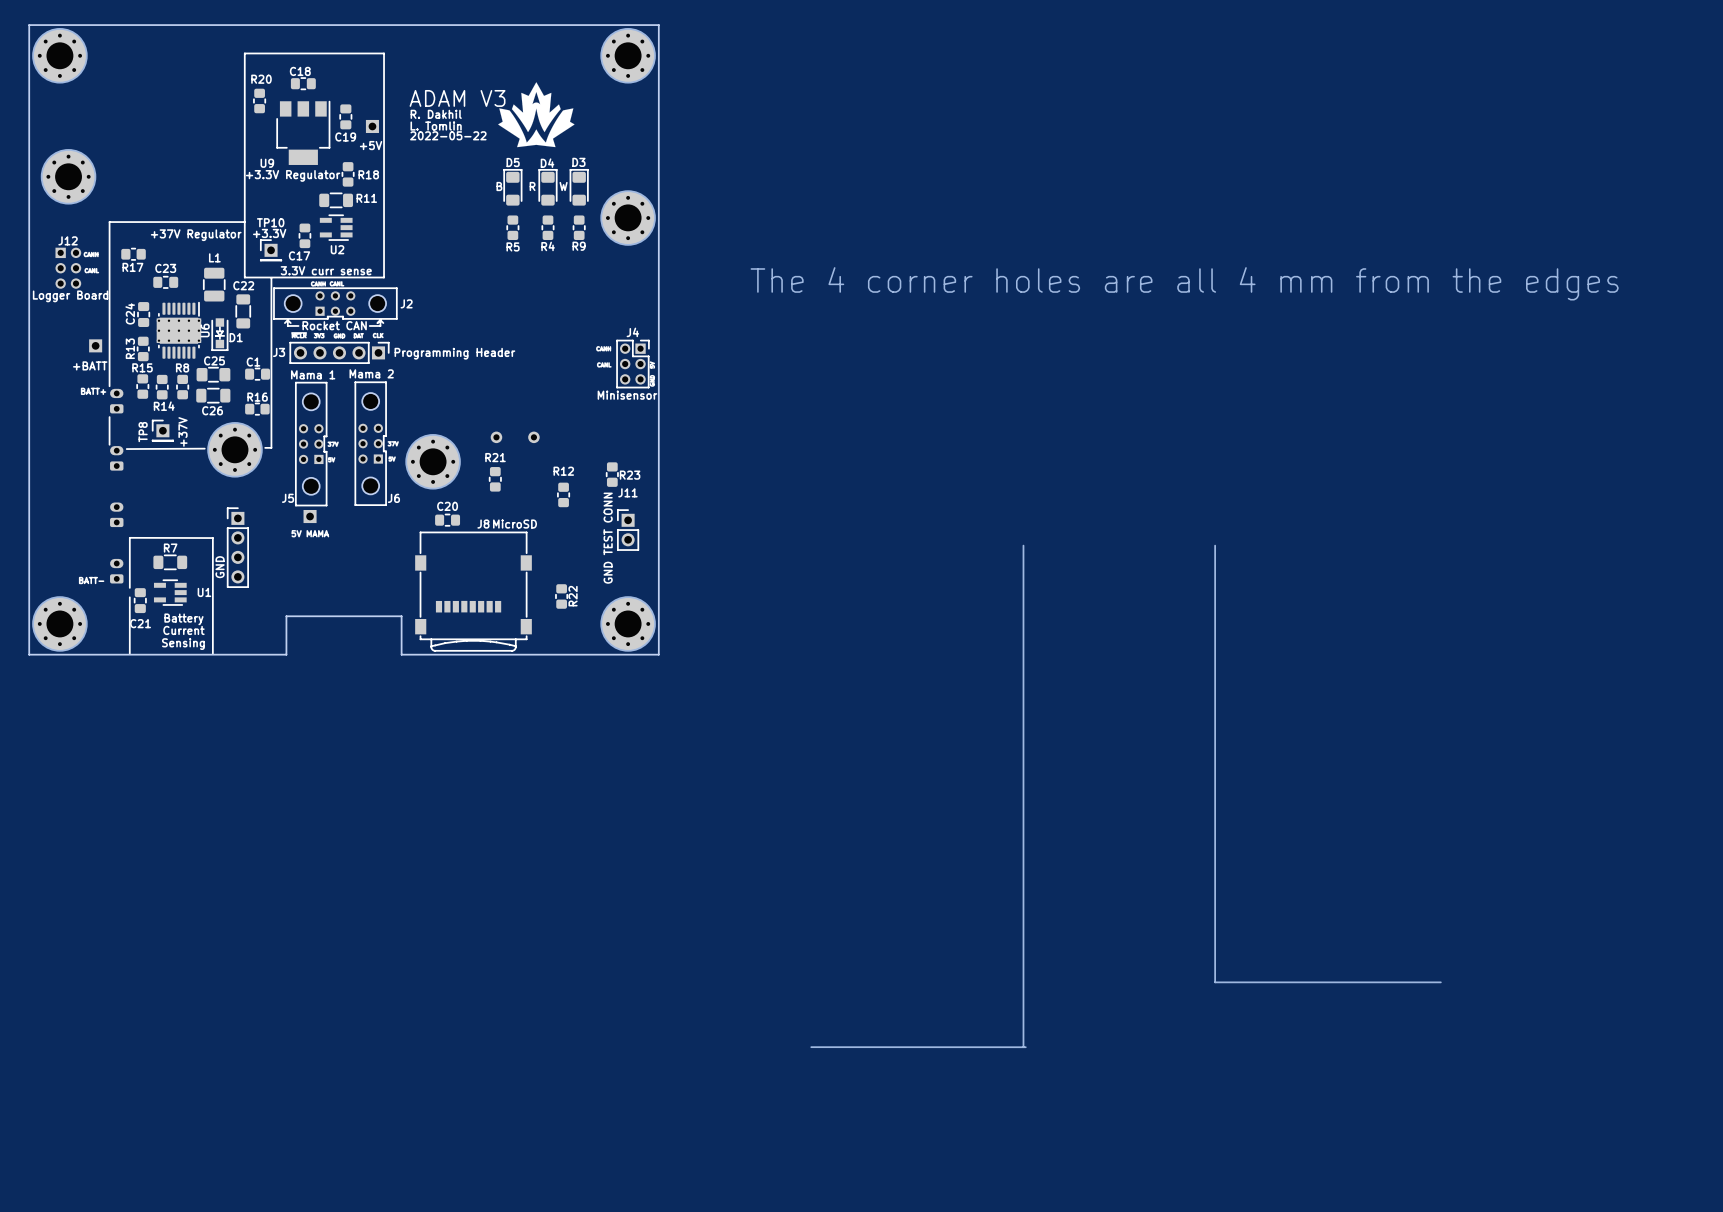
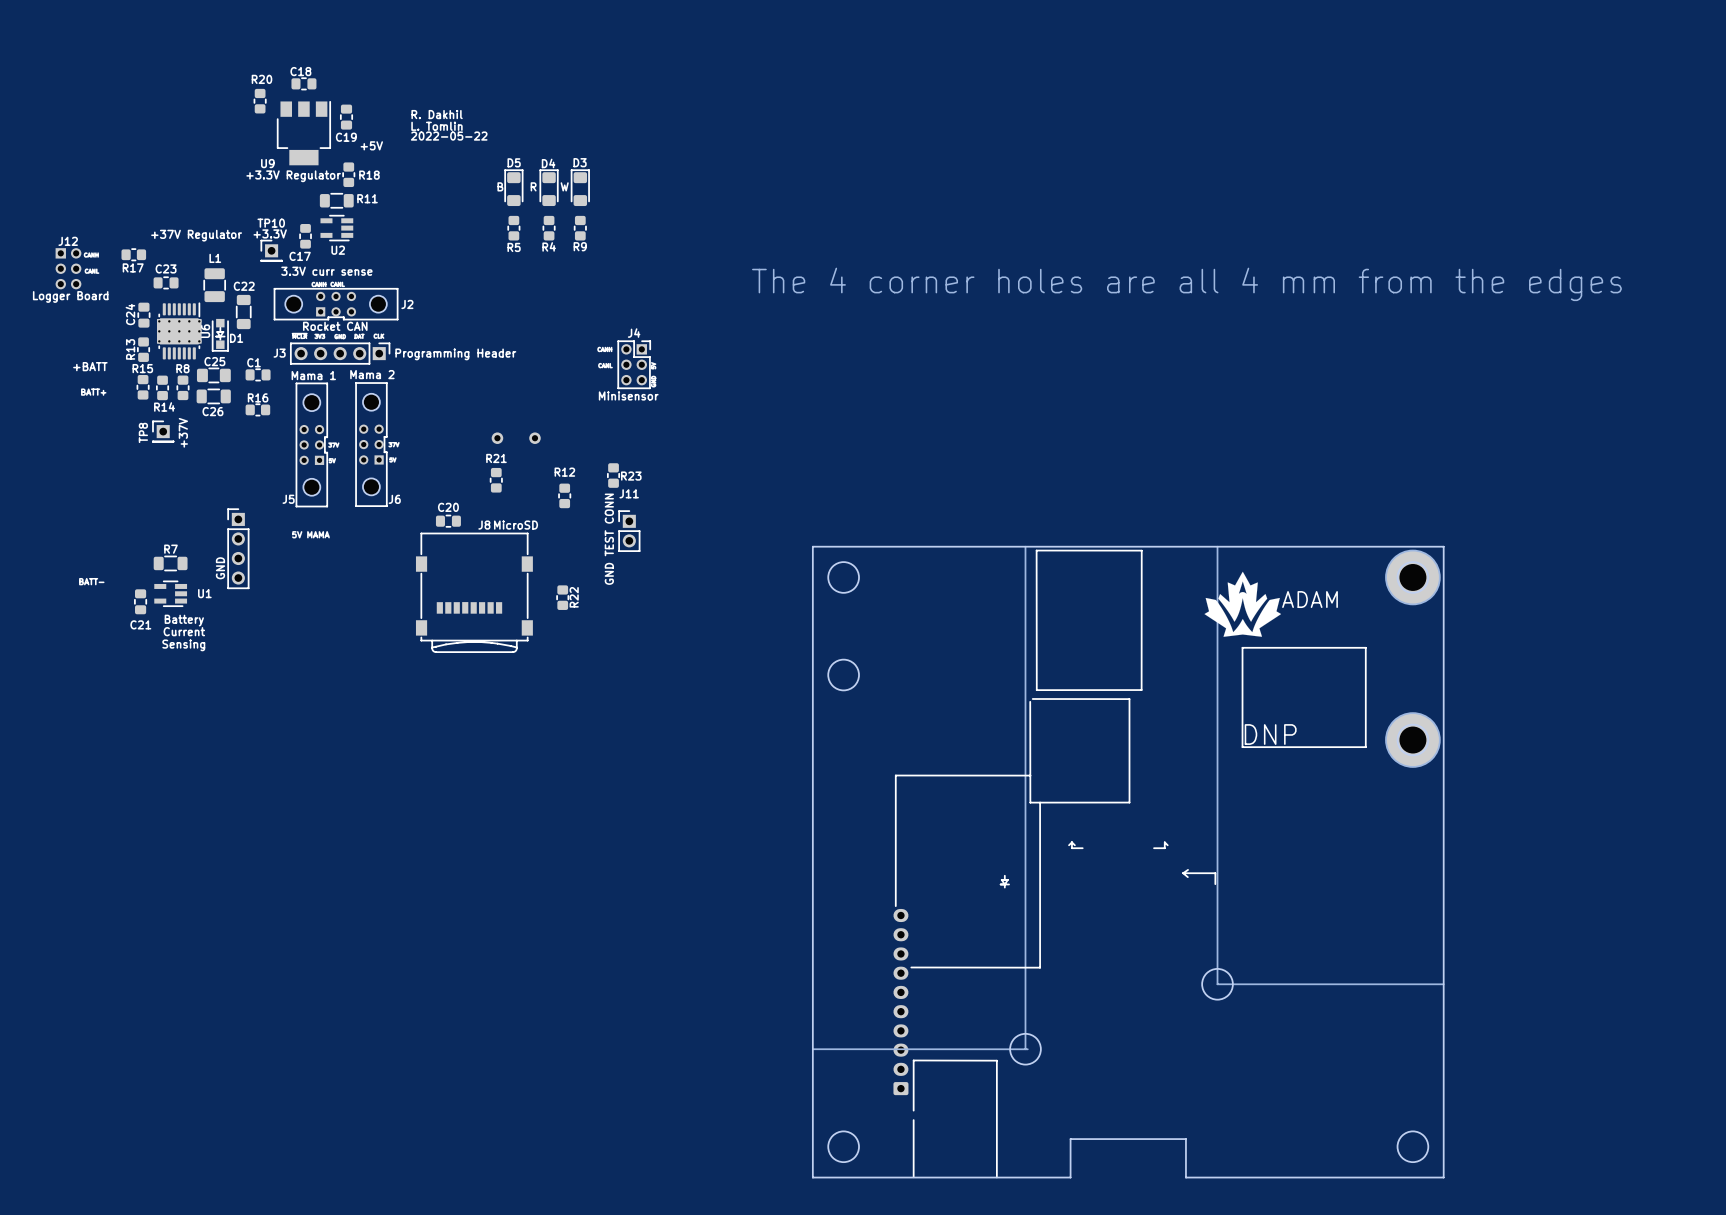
board edge: (29, 25) (658, 25) (658, 654) (401, 654) (401, 616) (286, 616) (286, 654) (29, 654) (29, 25) -> none
line: (244, 53) (384, 53) (384, 277) (244, 277) (244, 53) -> none
part: (59, 55) -> none
part: (628, 55) -> none
drawing: [498, 82, 575, 148] -> none
text: ADAM V3 (457, 98) -> none
part: (372, 126) -> none
part: (68, 176) -> none
part: (628, 218) -> none
line: (244, 222) (109, 222) (109, 386) -> none
line: (271, 277) (271, 447) (265, 447) -> none
line: (287, 320) (284, 323) -> none
line: (287, 320) (287, 325) (298, 325) -> none
line: (287, 320) (290, 323) -> none
line: (380, 320) (383, 323) -> none
line: (380, 320) (380, 325) (369, 325) -> none
part: (95, 345) -> none
part: (116, 401) -> none
line: (109, 417) (109, 444) -> none
line: (204, 448) (126, 449) -> none
part: (234, 449) -> none
part: (116, 458) -> none
part: (433, 461) -> none
part: (116, 514) -> none
part: (310, 516) -> none
board edge: none -> (812, 546) (812, 1177) (1070, 1177) (1070, 1139) (1185, 1139) (1185, 1177) (1443, 1177) (1443, 546) (812, 546)
line: none -> (1141, 550) (1036, 550) (1036, 690)
line: none -> (1141, 550) (1141, 689)
round board edge: none -> [828, 561, 860, 594]
drawing: none -> [1204, 571, 1282, 637]
part: (116, 571) -> none
part: none -> (1412, 577)
line: (129, 587) (129, 537) (212, 538) (212, 653) -> none
line: (129, 597) (129, 654) -> none
text: none -> ADAM (1310, 599)
part: (59, 623) -> none
part: (628, 623) -> none
line: none -> (1242, 647) (1242, 747) (1365, 747) (1365, 647) (1242, 647)
round board edge: none -> [828, 659, 860, 691]
line: none -> (1141, 690) (1036, 690)
line: none -> (1032, 698) (1129, 699) (1129, 802) (1030, 802) (1030, 701)
text: none -> DNP (1270, 734)
part: none -> (1412, 740)
line: none -> (1030, 775) (895, 775) (895, 906)
line: none -> (1040, 802) (1040, 967) (911, 967)
line: none -> (1071, 842) (1074, 845)
line: none -> (1071, 842) (1071, 848) (1082, 848)
line: none -> (1071, 842) (1069, 845)
line: none -> (1167, 845) (1164, 842) (1164, 848) (1154, 848)
line: none -> (1188, 869) (1183, 873)
line: none -> (1183, 873) (1187, 877)
line: none -> (1183, 873) (1215, 873) (1215, 884)
line: none -> (1004, 875) (1004, 879)
line: none -> (1007, 879) (1004, 884) (1001, 879) (1007, 879)
line: none -> (1004, 884) (1000, 884) (1009, 884)
line: none -> (1004, 884) (1004, 887)
round board edge: none -> [1201, 968, 1234, 1000]
part: none -> (900, 1002)
round board edge: none -> [1009, 1033, 1042, 1065]
line: none -> (913, 1110) (913, 1060) (996, 1060) (996, 1177)
line: none -> (913, 1120) (913, 1177)
round board edge: none -> [828, 1131, 860, 1163]
round board edge: none -> [1397, 1131, 1429, 1163]

